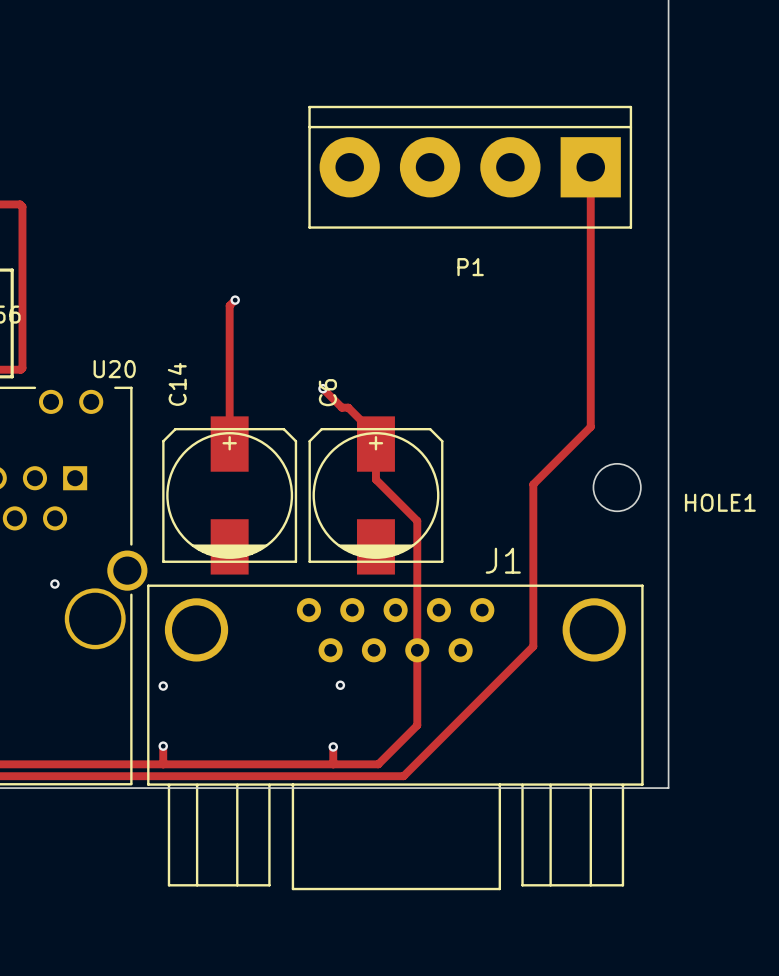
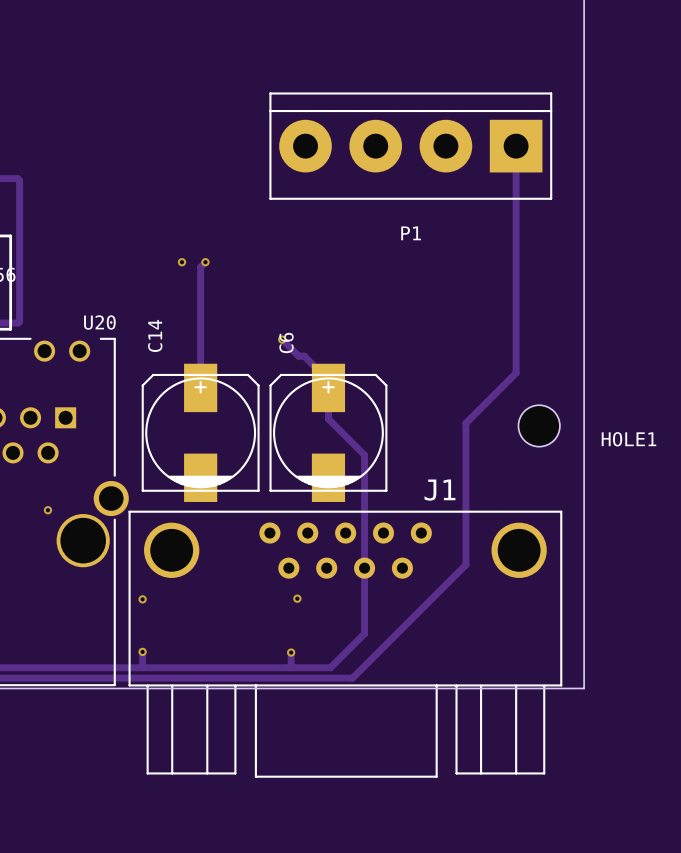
via: none -> (181, 262)

